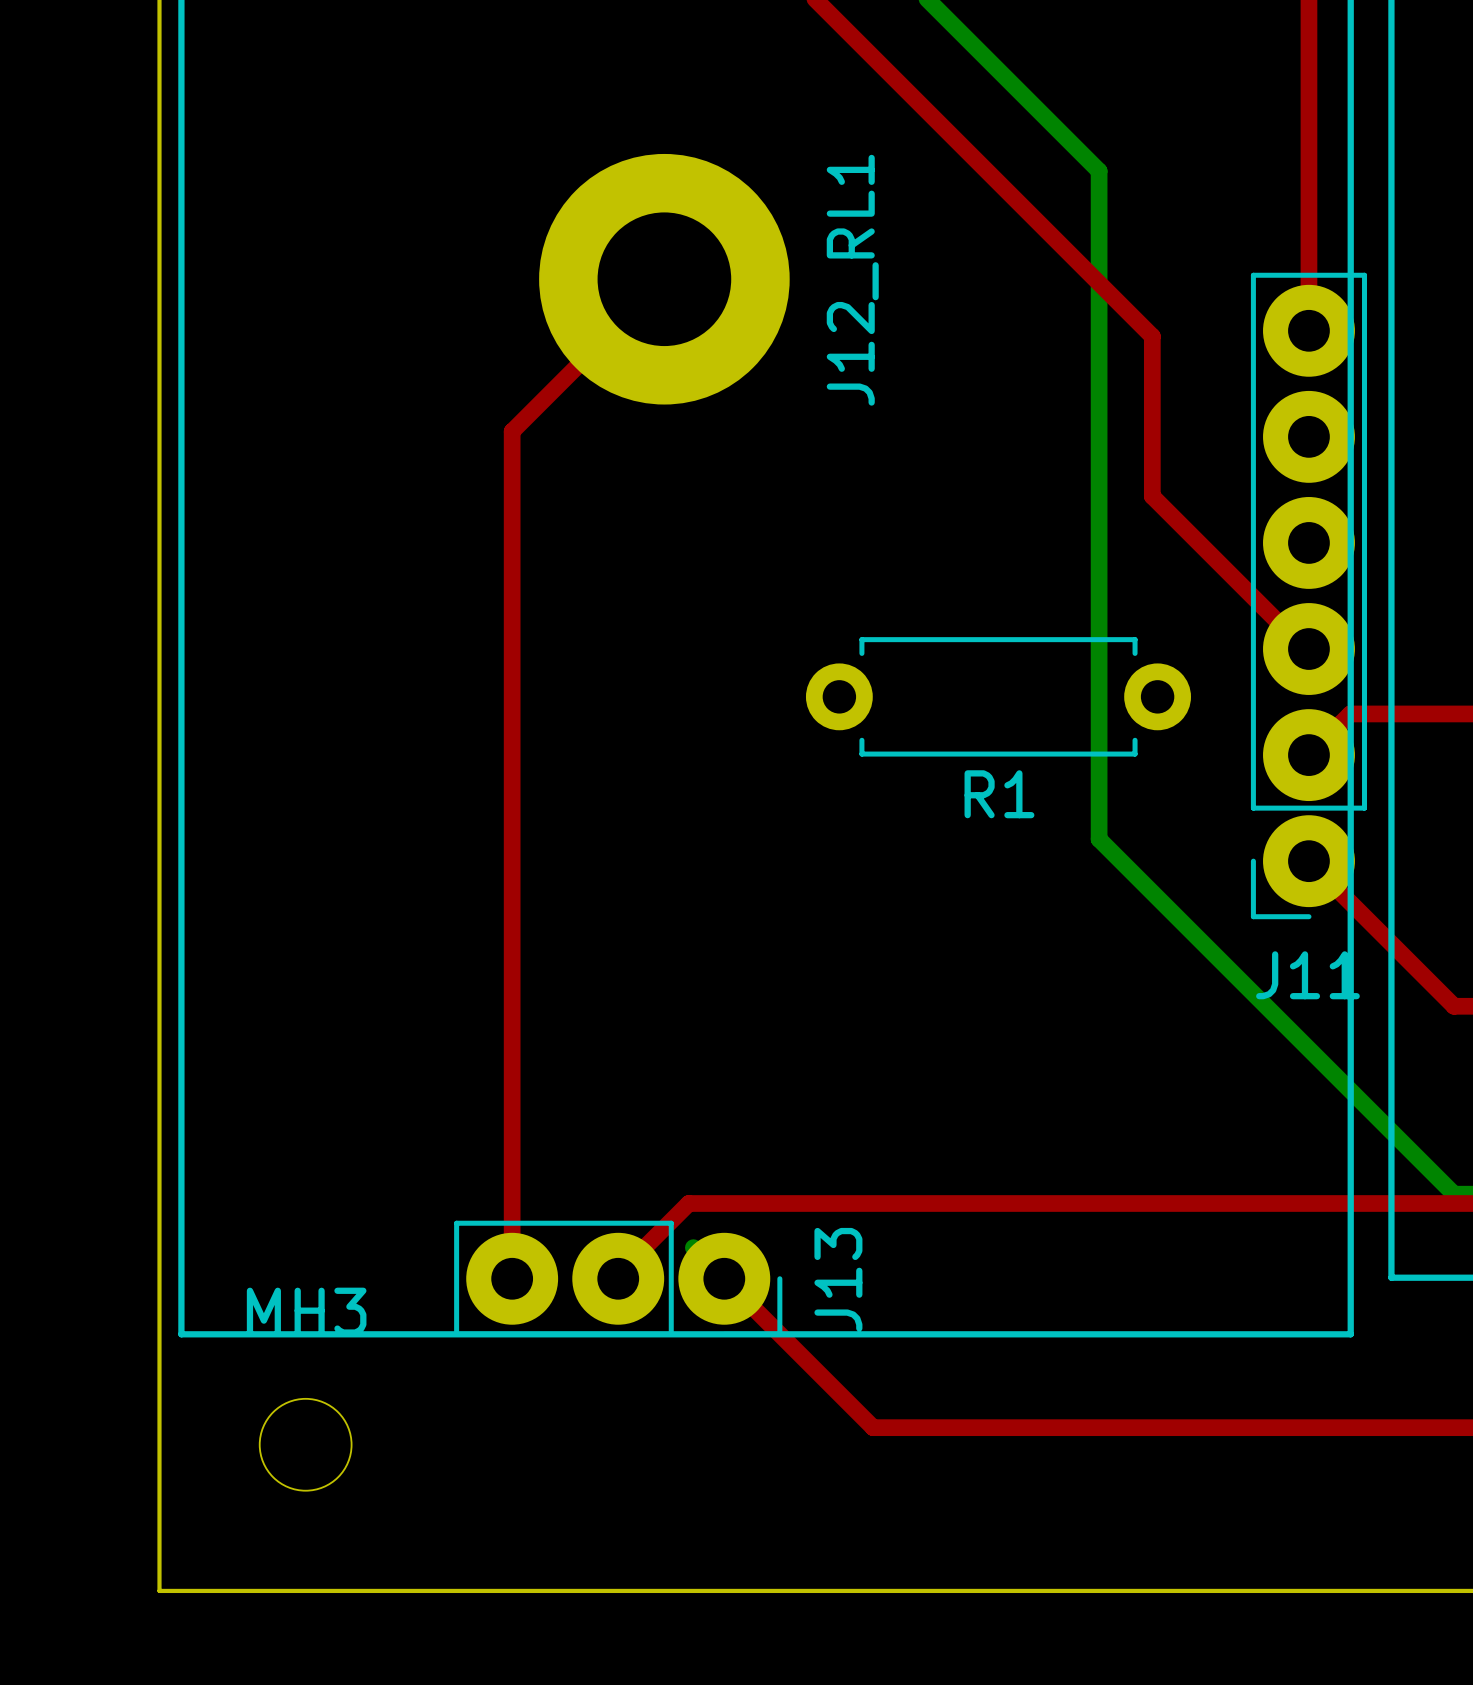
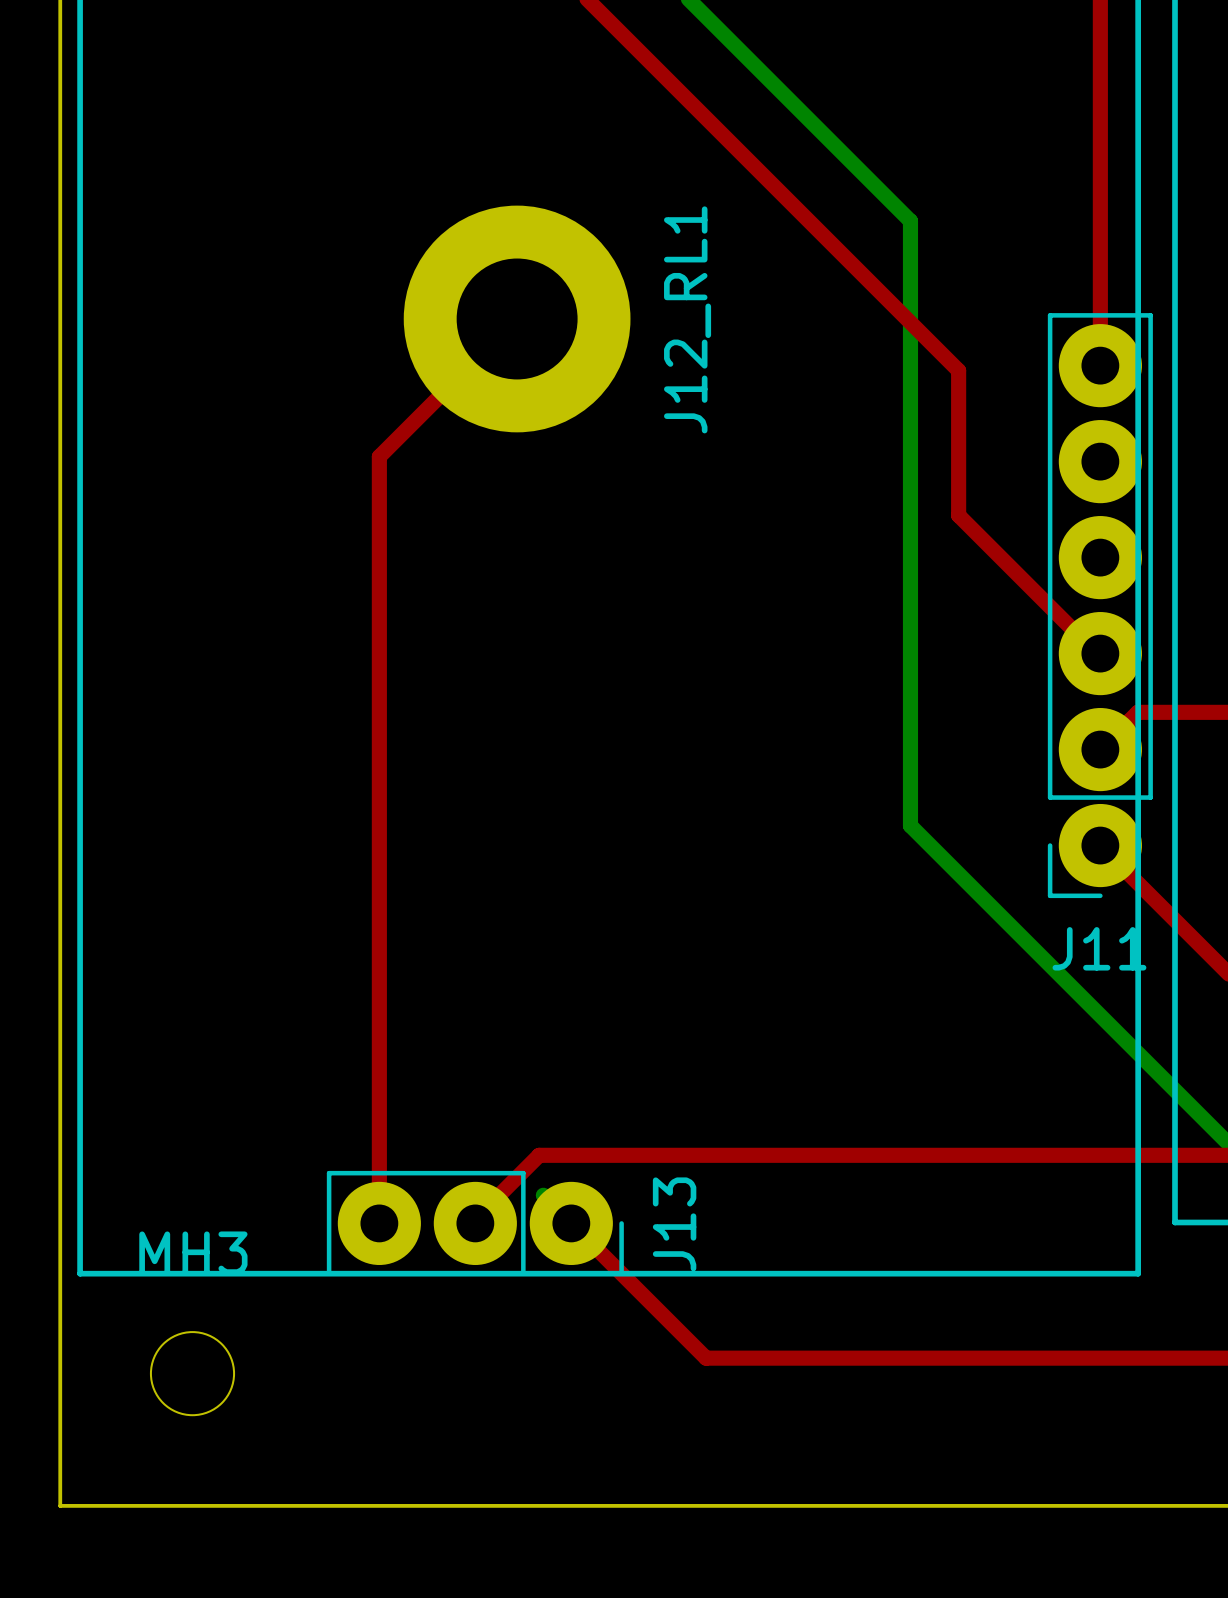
R1: (998, 696) -> none

